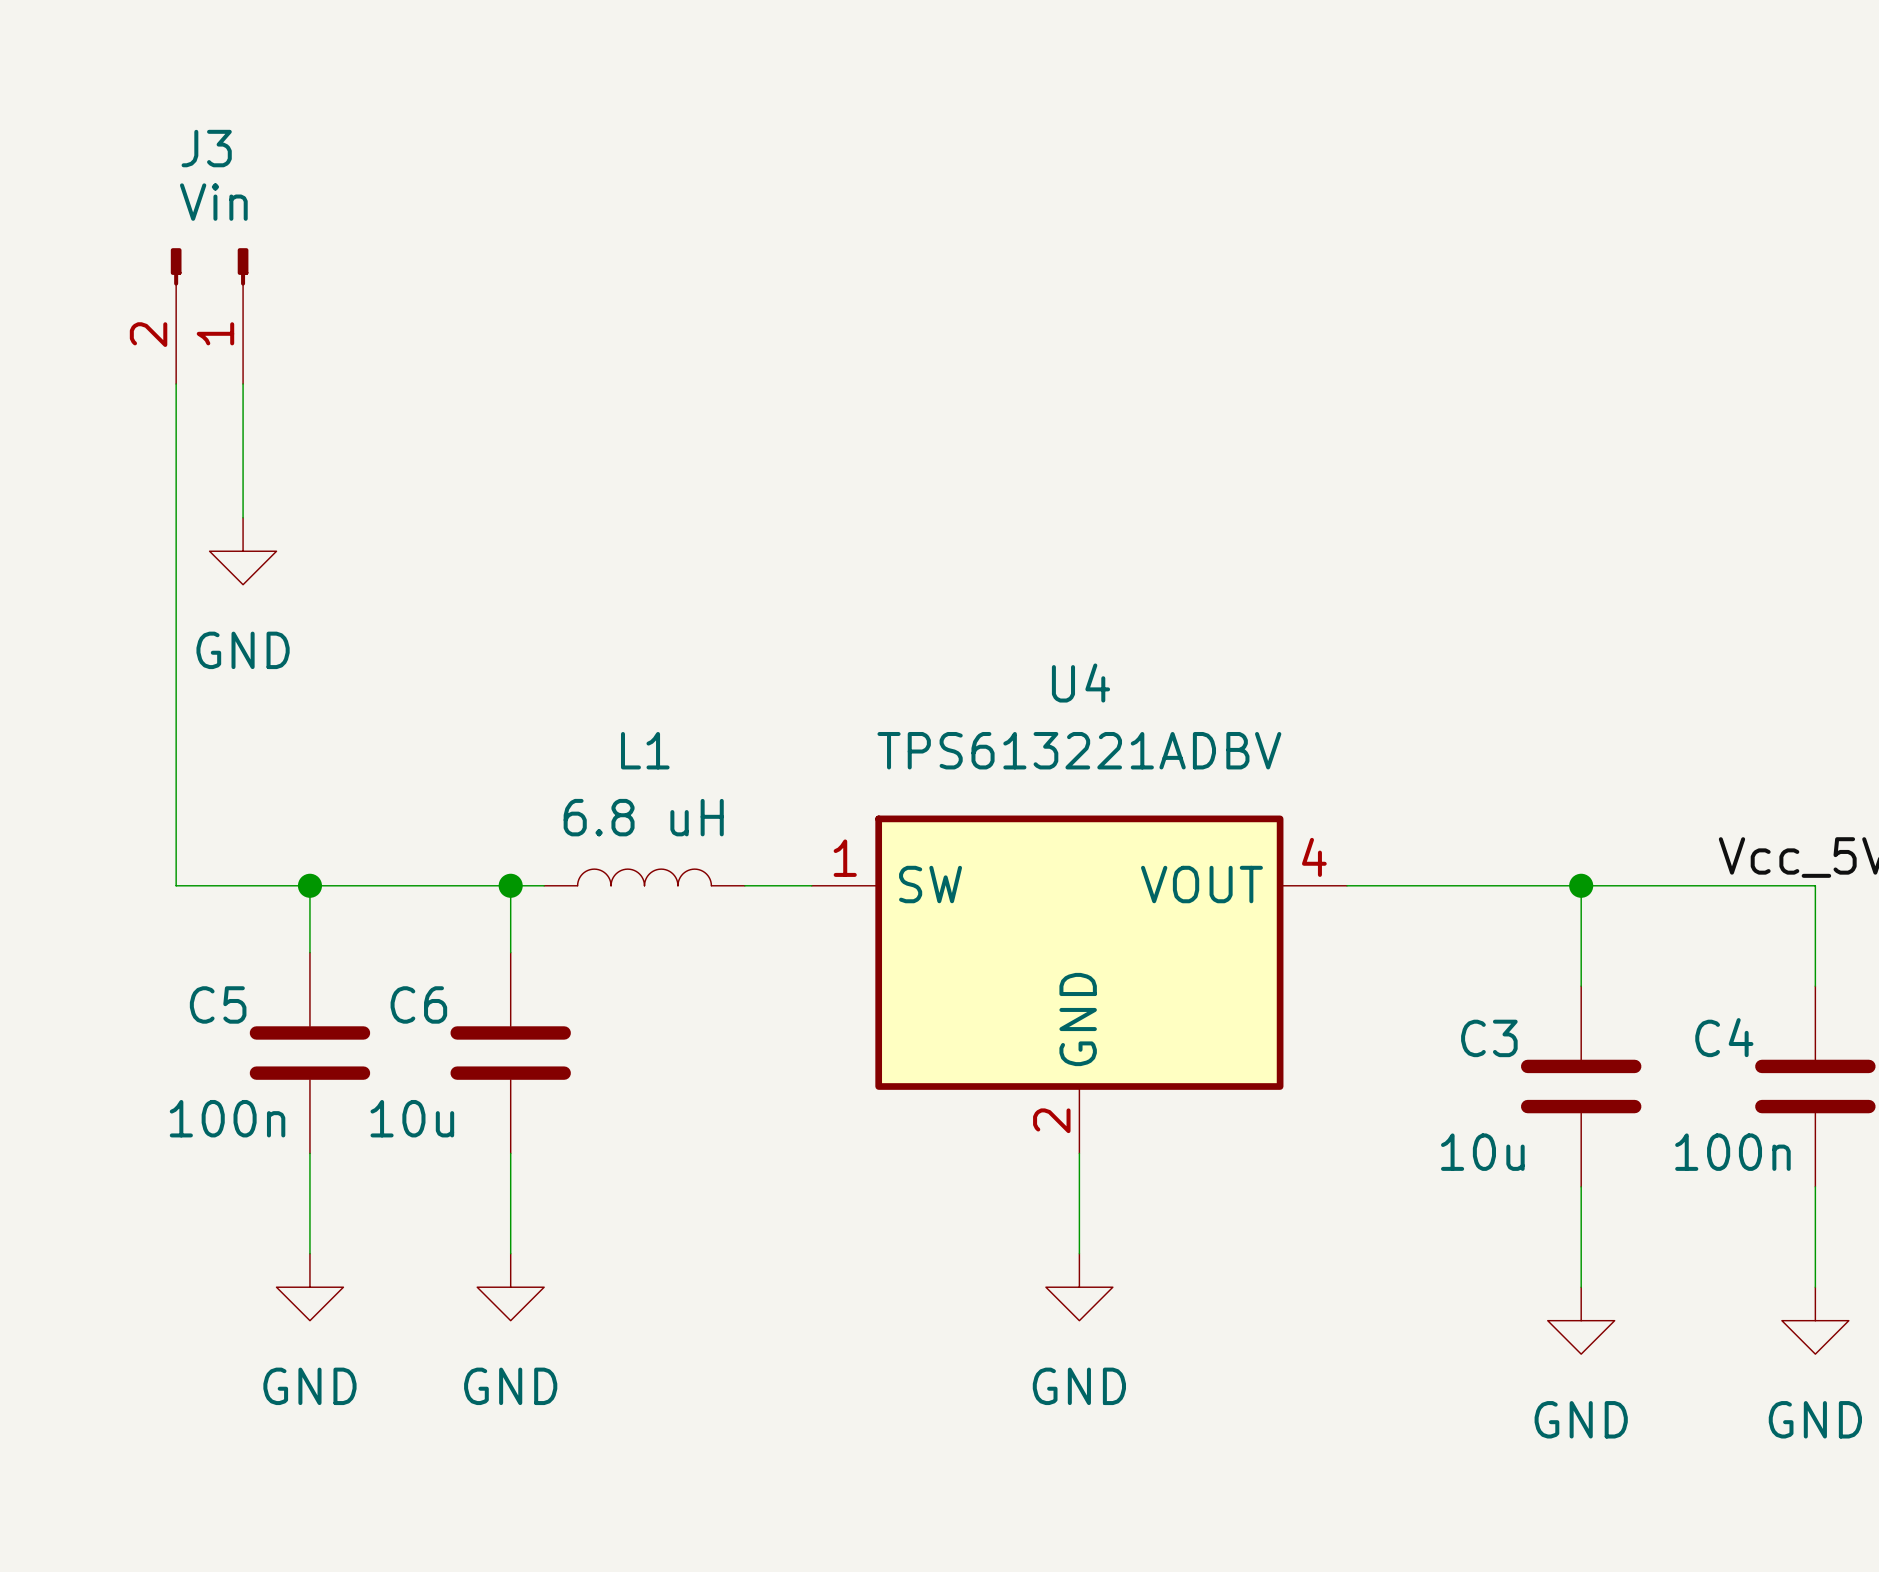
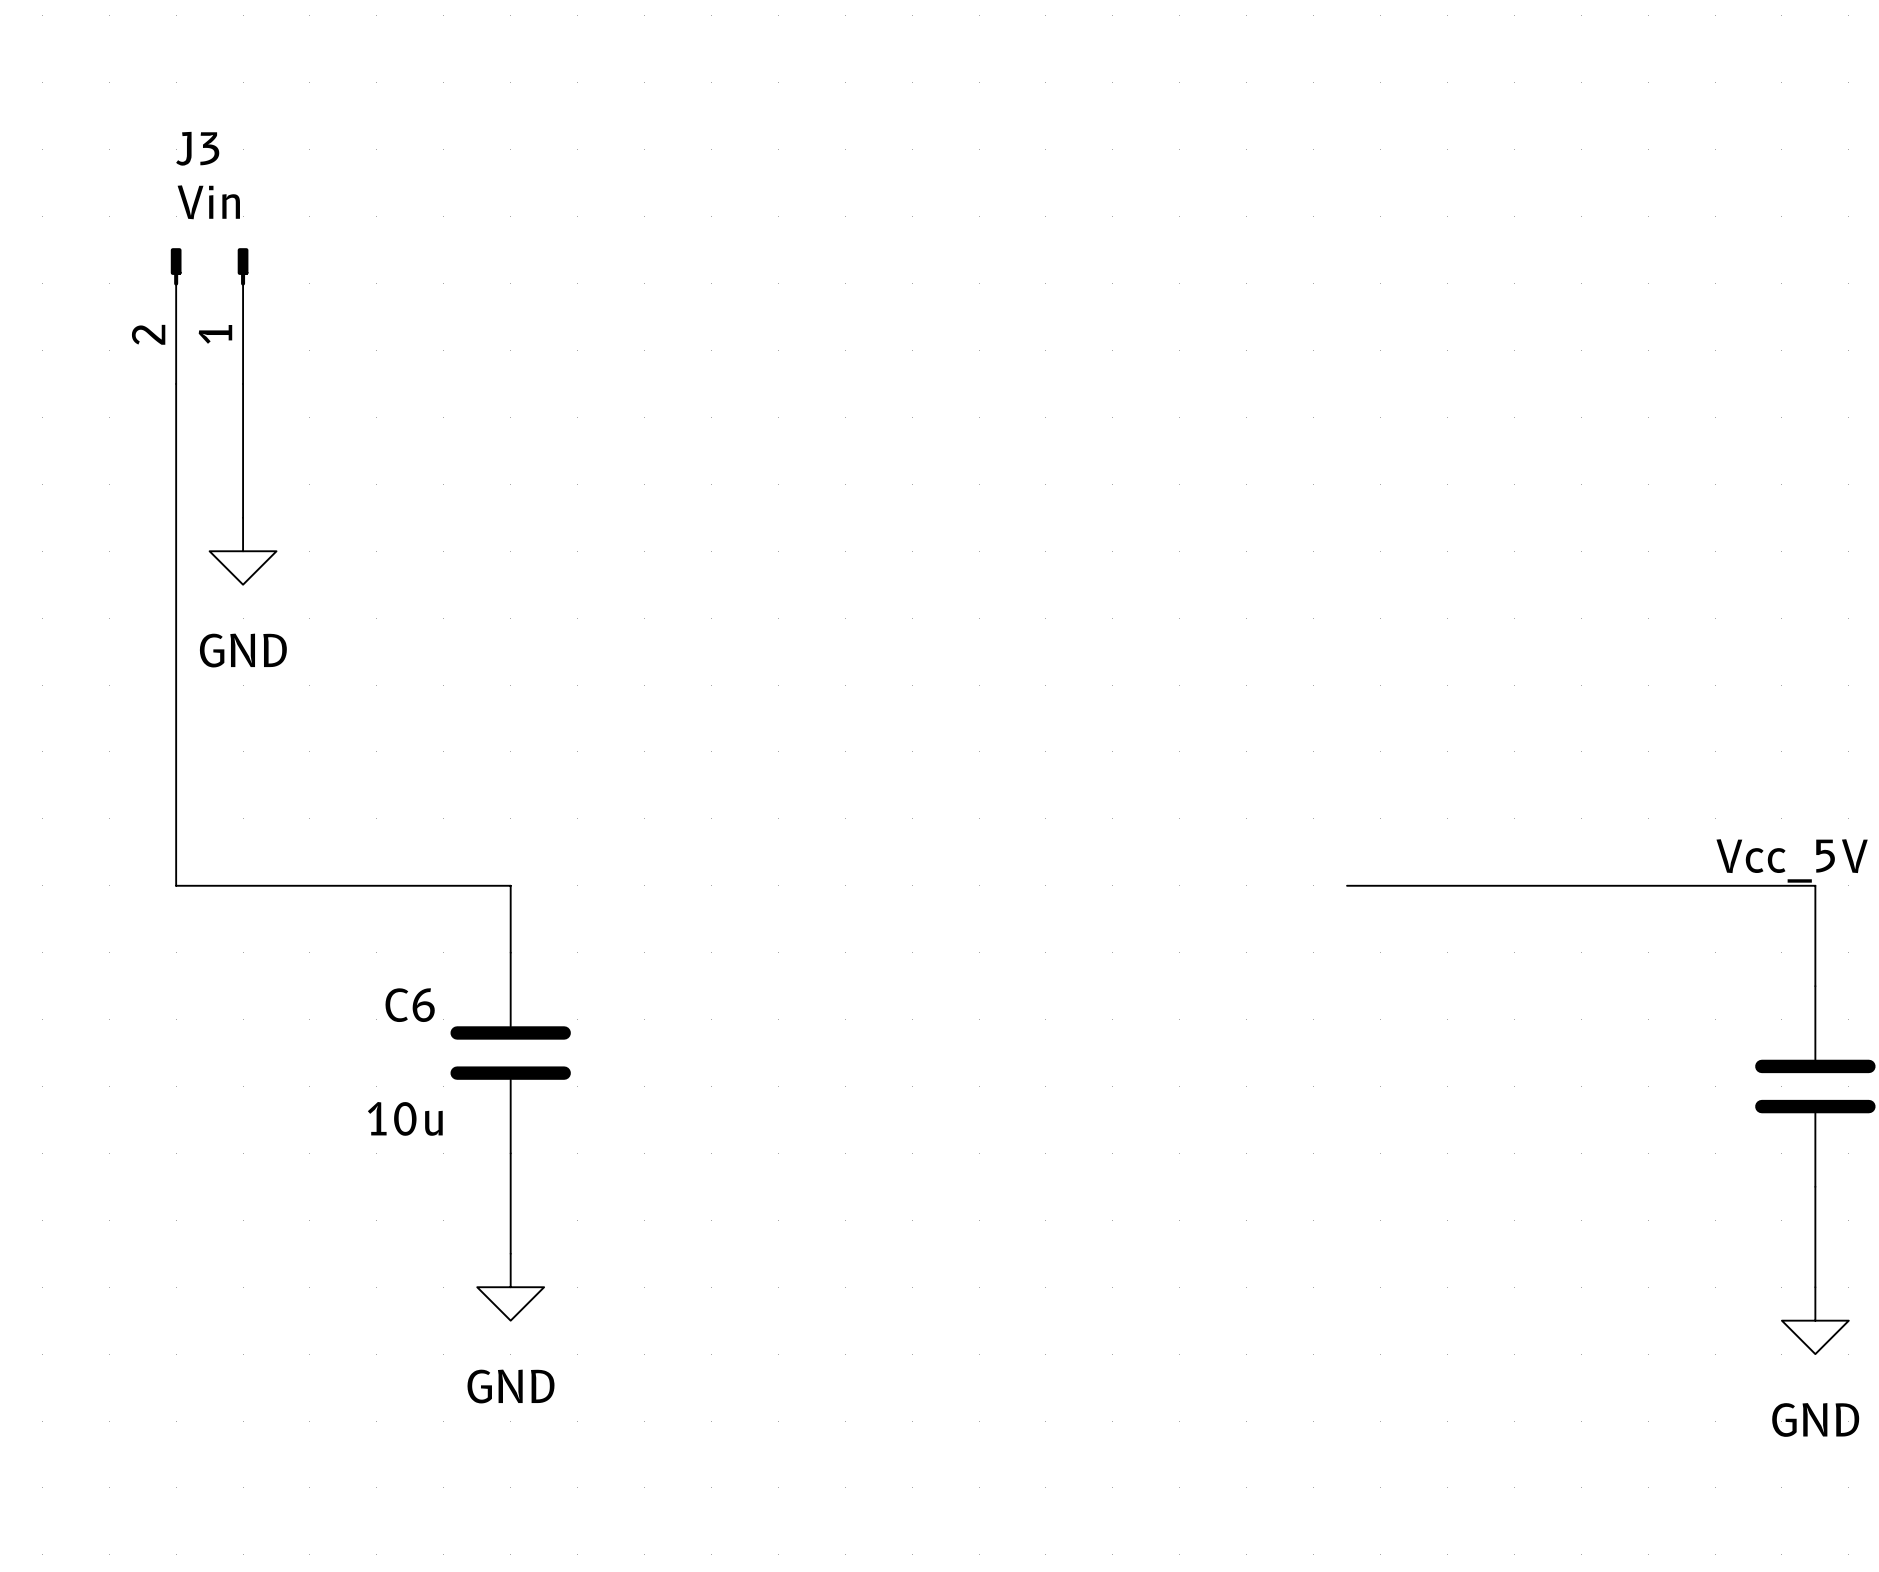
L1: 6.8 uH (644, 877) -> none
wire: (309, 885) (309, 952) -> none
junction: (309, 885) -> none
wire: (510, 885) (544, 885) -> none
junction: (510, 885) -> none
wire: (744, 885) (811, 885) -> none
wire: (1581, 885) (1581, 986) -> none
junction: (1581, 885) -> none
U4: TPS613221ADBV (1079, 984) -> none
C4 name: C4 (1724, 1037) -> none
C5: 100n (309, 1053) -> none
C3: 10u (1581, 1086) -> none
C4 value: 100n (1732, 1152) -> none
wire: (309, 1153) (309, 1253) -> none
wire: (1079, 1153) (1079, 1253) -> none
wire: (1581, 1186) (1581, 1287) -> none
power symbol: GND (309, 1287) -> none
power symbol: GND (1079, 1287) -> none
power symbol: GND (1581, 1320) -> none

